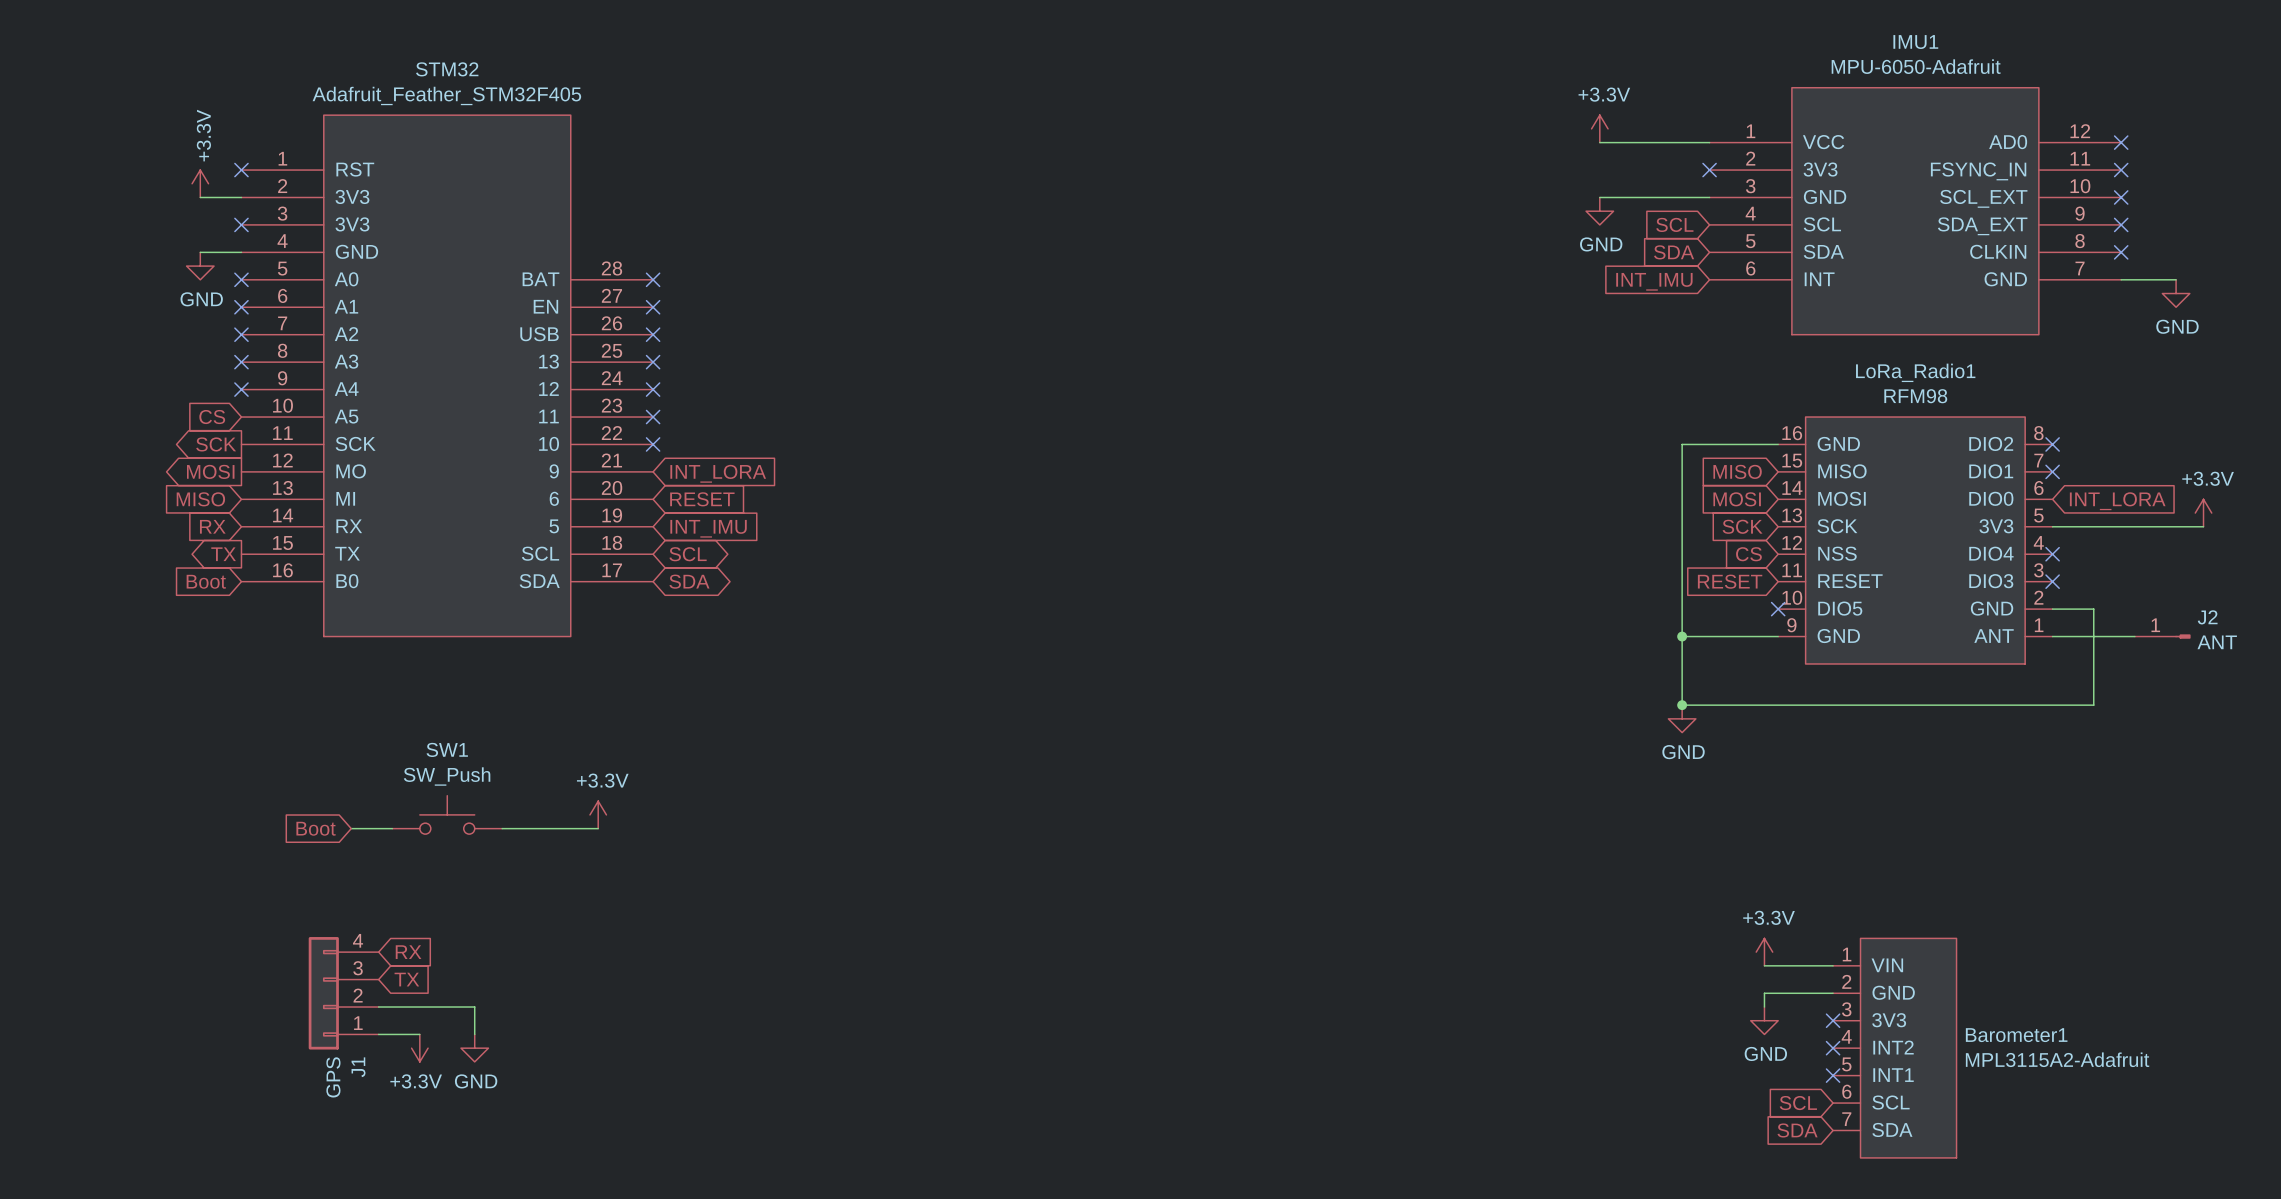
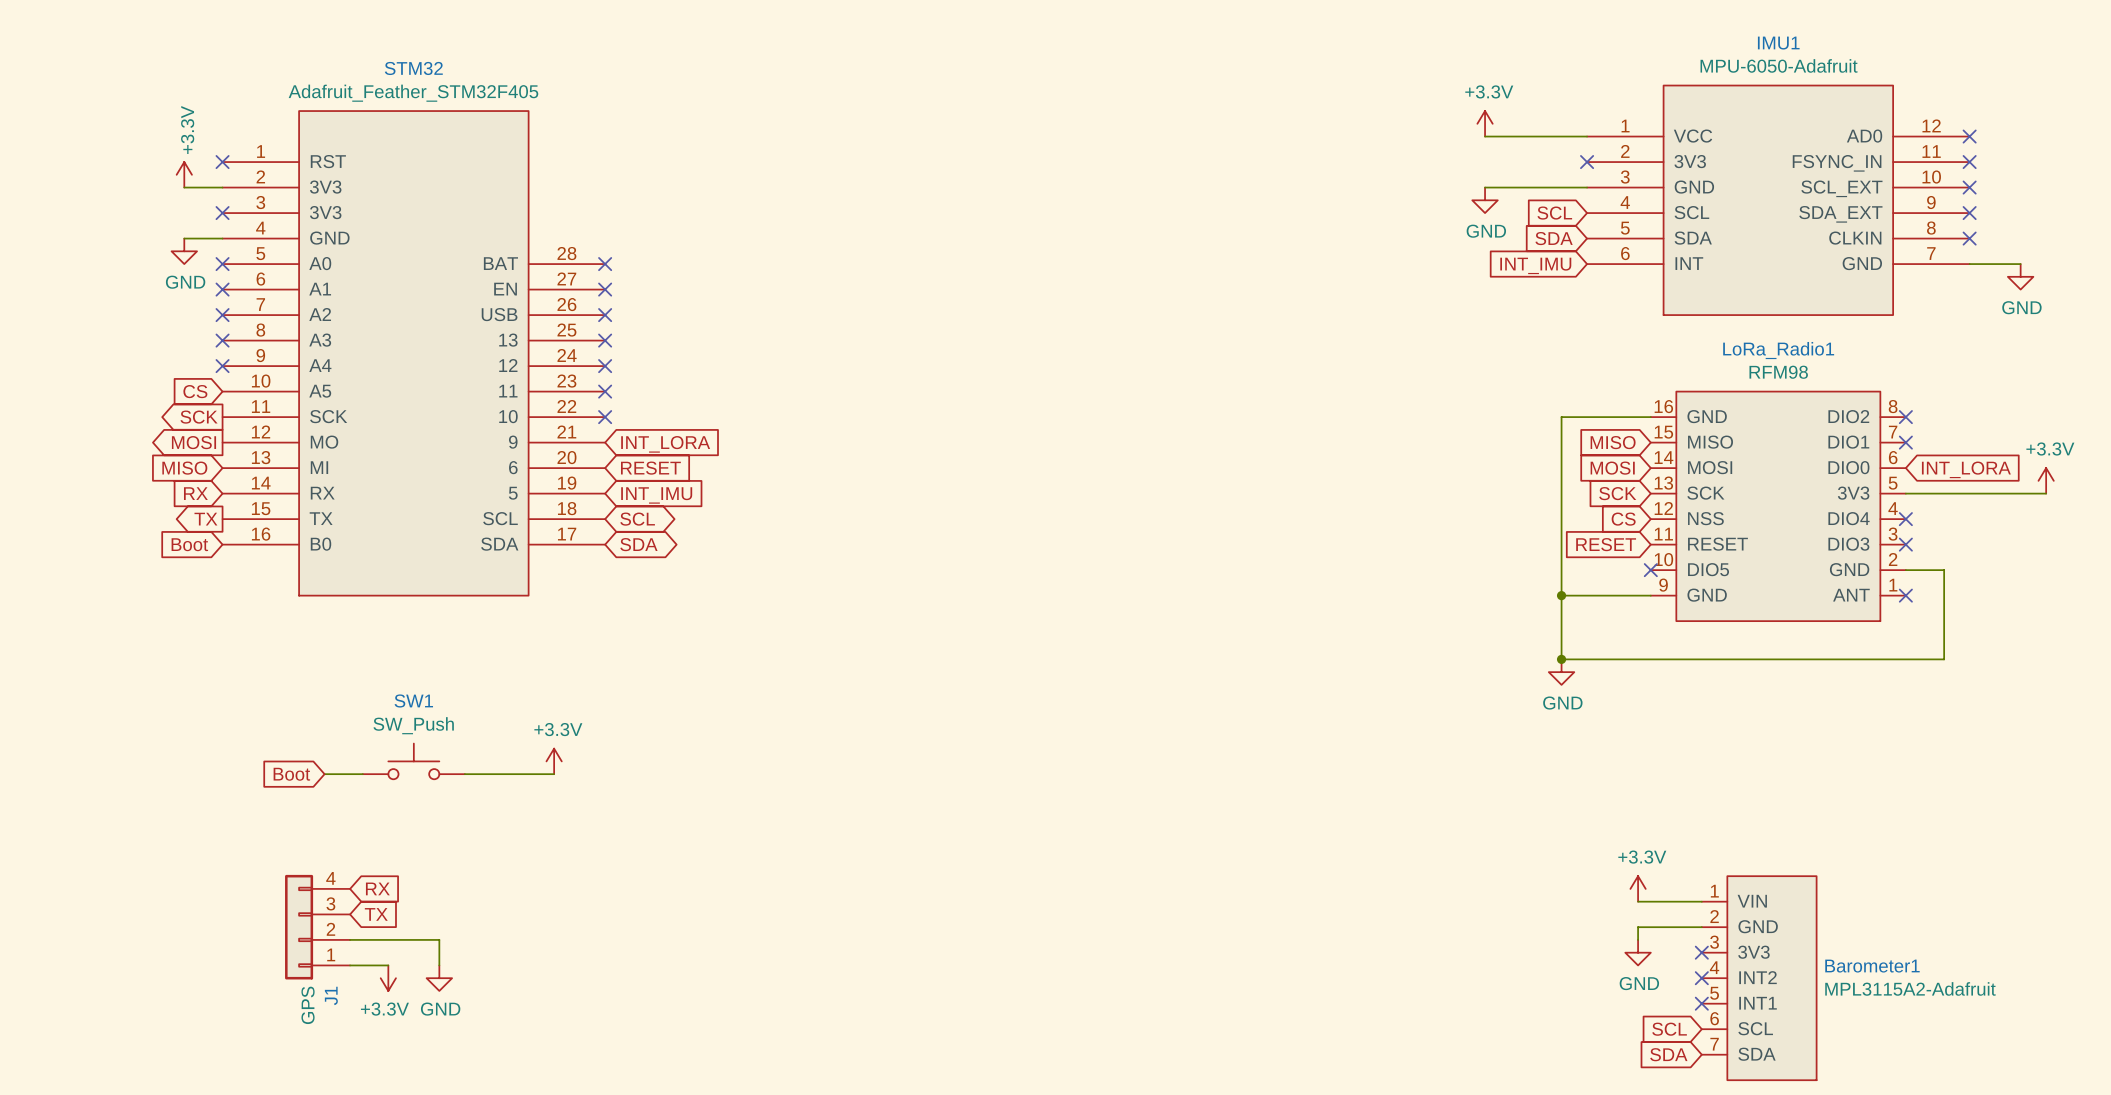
wire: (2052, 636) (2134, 636) -> none
no-connect mark: none -> (1905, 595)
J2: ANT (2162, 636) -> none

